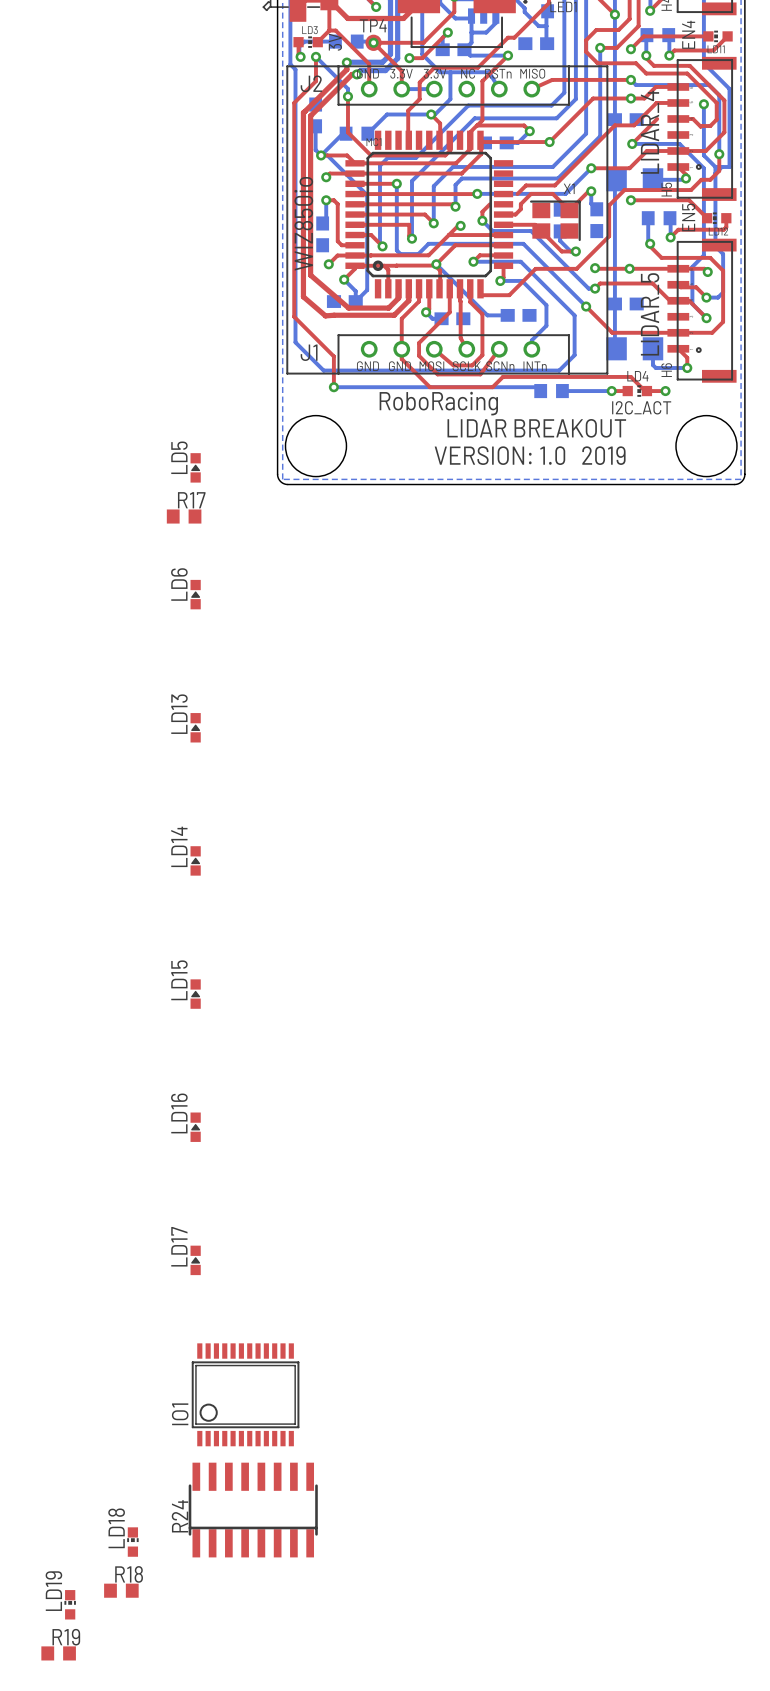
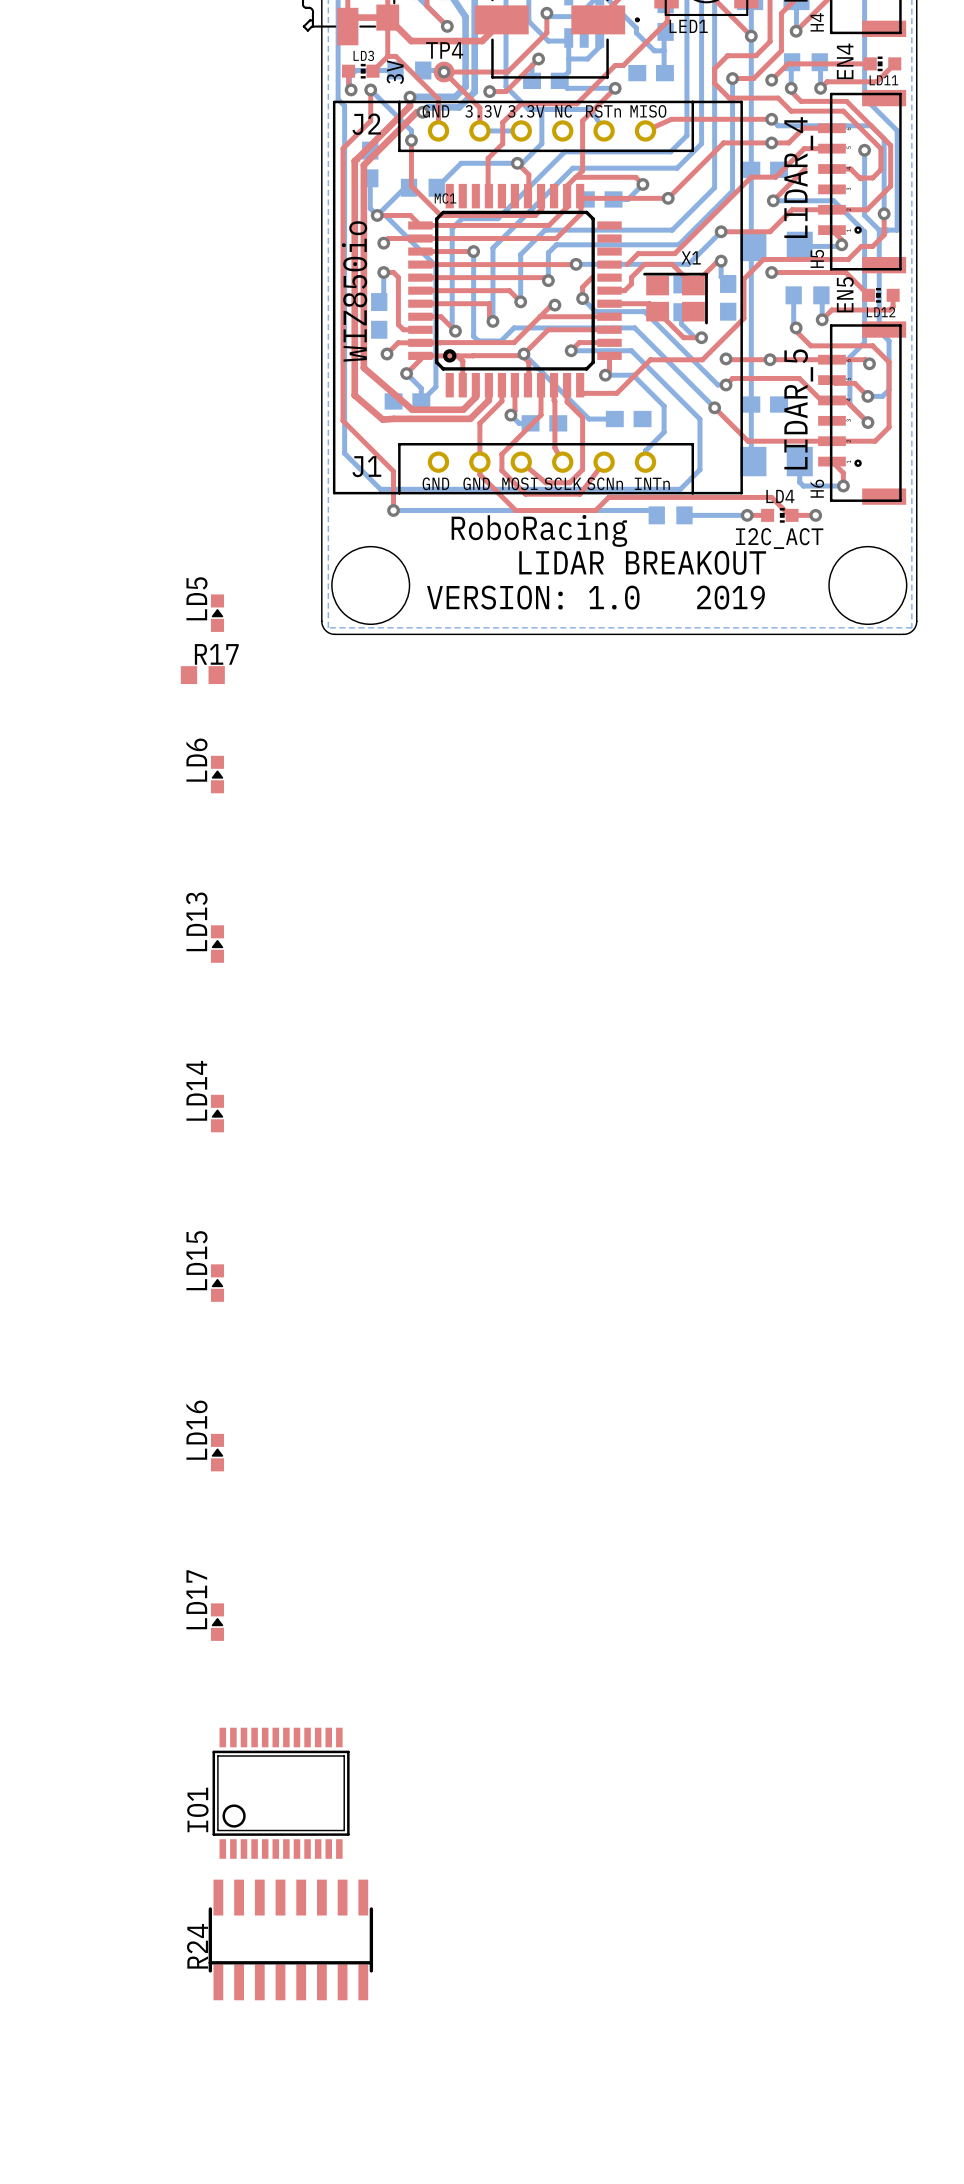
LD18: (132, 1542) -> none
R18: (121, 1590) -> none
LD19: (70, 1604) -> none
R19: (58, 1653) -> none

